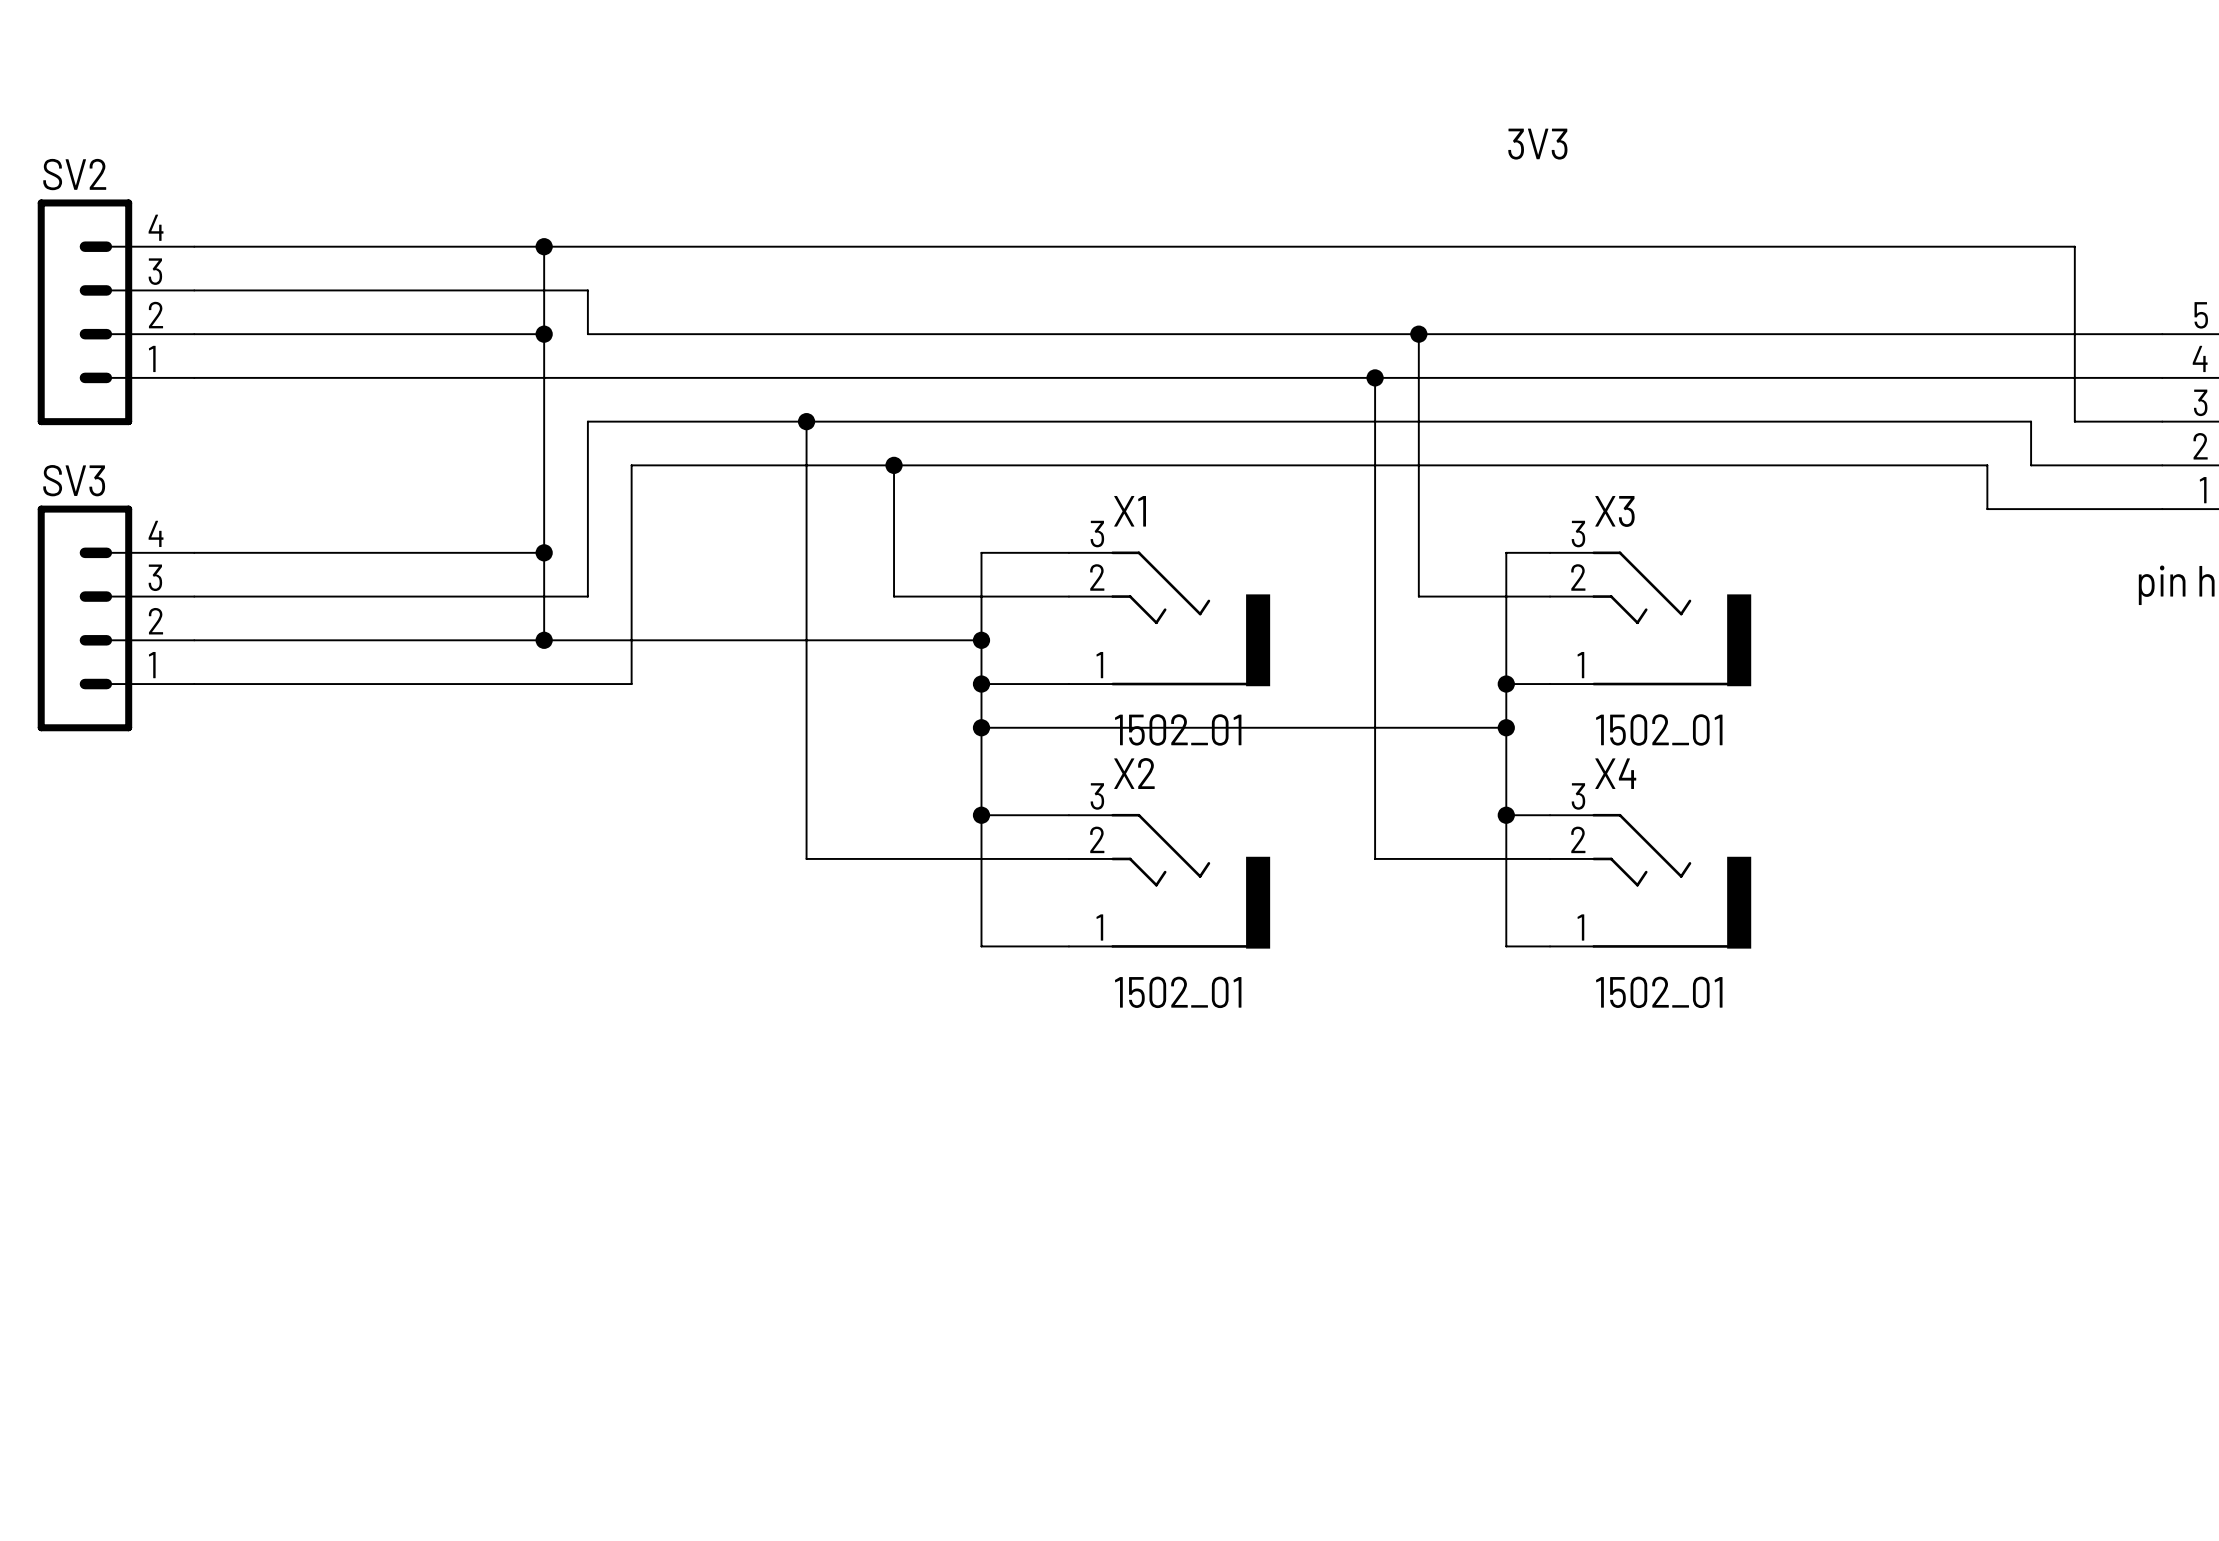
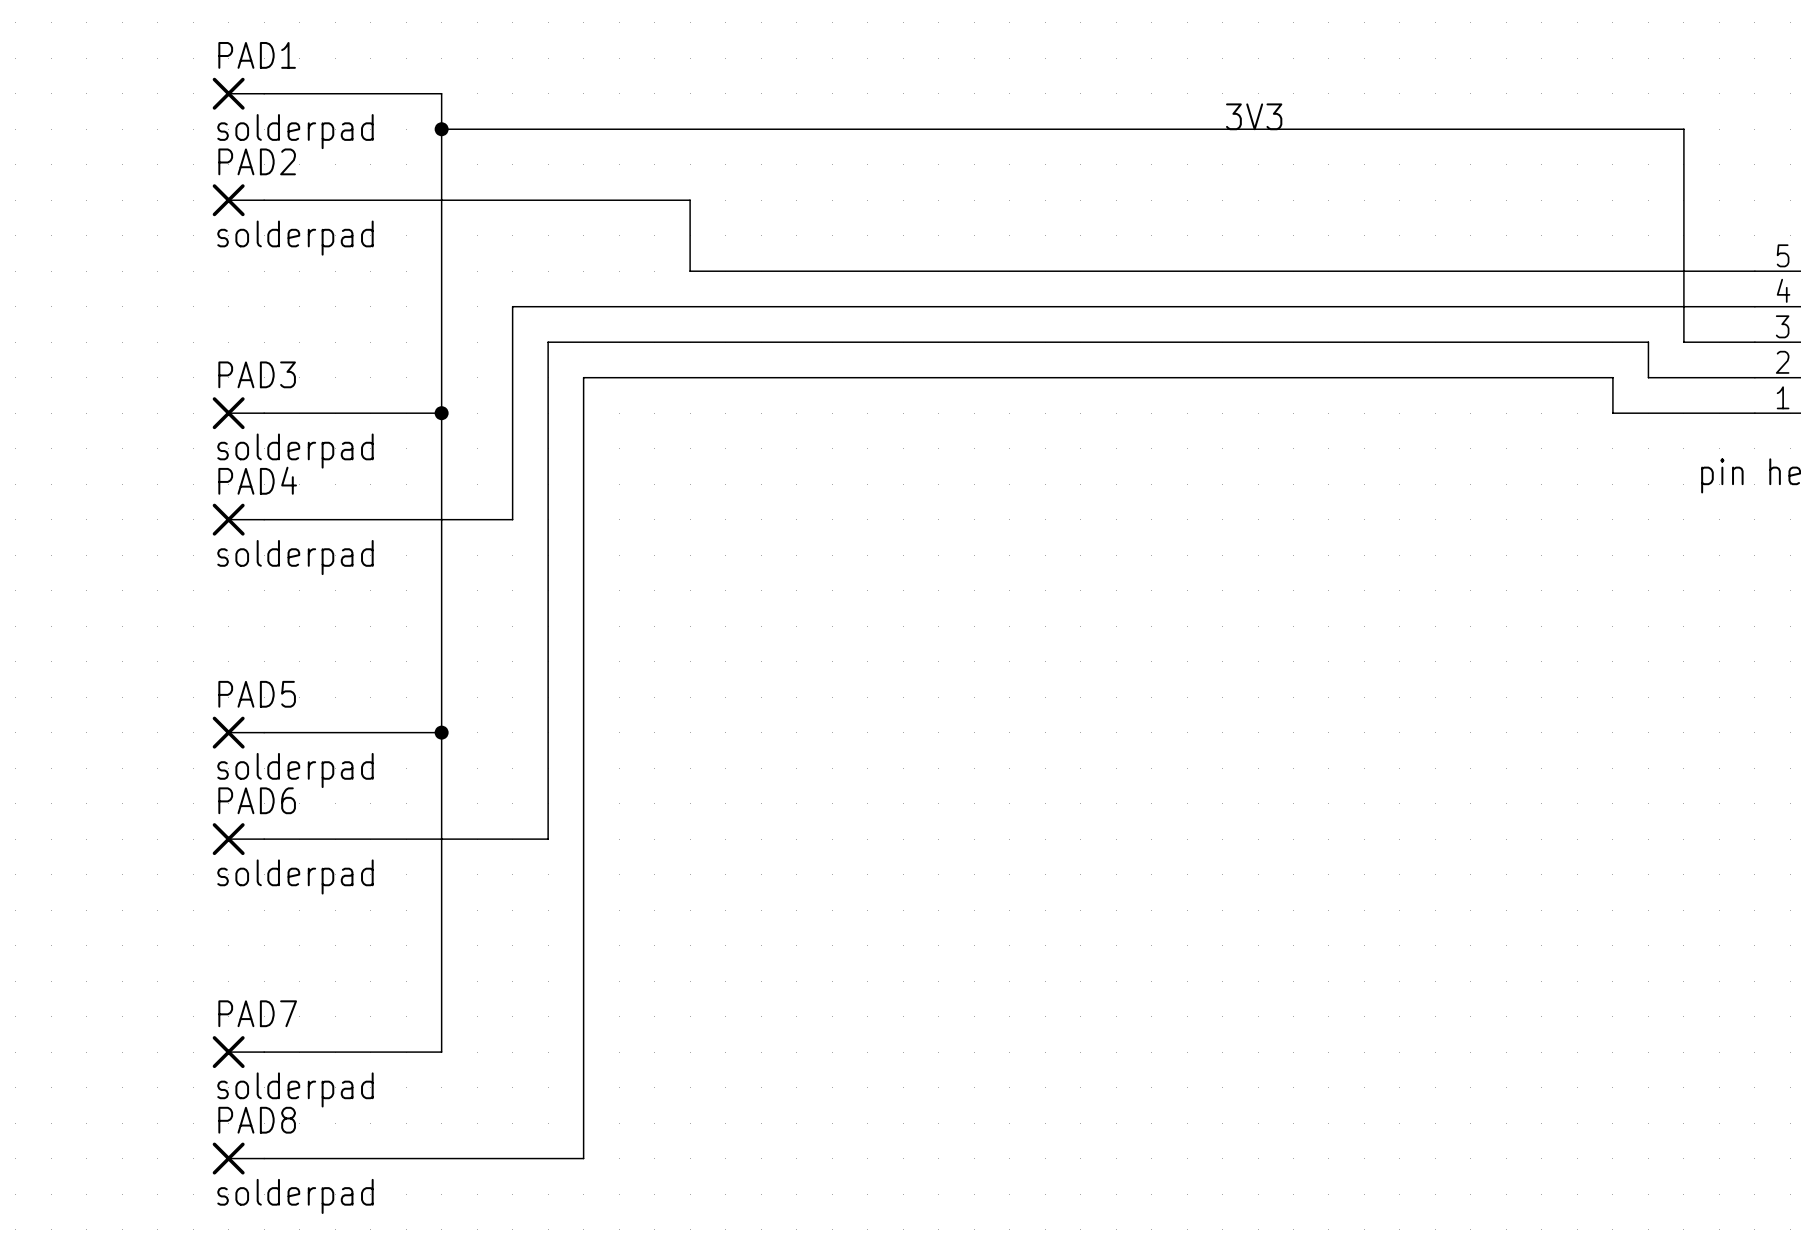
PAD1: none -> solderpad (238, 93)
wire: none -> (264, 93) (441, 93) (441, 200)
junction: none -> (441, 129)
wire: (194, 246) (325, 246) -> none
PAD2: none -> solderpad (238, 200)
junction: (544, 246) -> none
wire: (850, 246) (2074, 246) -> (441, 129) (1683, 129) (1683, 200)
wire: (194, 290) (587, 290) (587, 334) (850, 334) -> (690, 200) (690, 271)
SV2: (116, 312) -> none
wire: (194, 334) (544, 334) -> none
junction: (544, 334) -> none
wire: (1418, 334) (1418, 596) (1550, 596) -> none
junction: (1418, 334) -> none
wire: (194, 377) (631, 377) -> none
wire: (1375, 377) (1375, 858) (1550, 858) -> none
junction: (1375, 377) -> none
wire: (675, 421) (587, 421) (587, 596) (194, 596) -> (548, 342) (548, 839) (264, 839)
wire: (806, 421) (806, 858) (1068, 858) -> none
junction: (806, 421) -> none
wire: (631, 465) (719, 465) -> (512, 377) (512, 306)
wire: none -> (583, 377) (583, 1158) (264, 1158)
wire: (894, 465) (894, 596) (1068, 596) -> none
junction: (894, 465) -> none
PAD3: none -> solderpad (238, 413)
wire: none -> (264, 413) (441, 413)
wire: (194, 552) (544, 552) -> none
junction position: (544, 552) -> (441, 413)
wire: (1068, 552) (981, 552) (981, 946) (1068, 946) -> none
wire: (1550, 552) (1506, 552) (1506, 946) (1550, 946) -> none
SV3: (116, 618) -> none
X1: 1502_01 (1169, 618) -> none
X3: 1502_01 (1650, 618) -> none
wire: (194, 640) (325, 640) -> none
PAD4: none -> solderpad (238, 519)
wire: none -> (441, 519) (441, 1052) (264, 1052)
junction: (544, 640) -> none
wire: (981, 640) (631, 640) (631, 684) (194, 684) -> none
junction: (981, 640) -> none
wire: (981, 684) (1068, 684) -> none
junction: (981, 684) -> none
wire: (1506, 684) (1550, 684) -> none
junction: (1506, 684) -> none
wire: (981, 727) (1506, 727) -> none
junction: (981, 727) -> none
junction: (1506, 727) -> none
wire: (981, 815) (1068, 815) -> none
junction: (981, 815) -> none
wire: (1506, 815) (1550, 815) -> none
junction: (1506, 815) -> none
X2: 1502_01 (1169, 881) -> none
X4: 1502_01 (1650, 881) -> none
PAD5: none -> solderpad (238, 732)
wire: none -> (264, 732) (441, 732)
junction: none -> (441, 732)
PAD6: none -> solderpad (238, 839)
PAD7: none -> solderpad (238, 1052)
PAD8: none -> solderpad (238, 1158)

